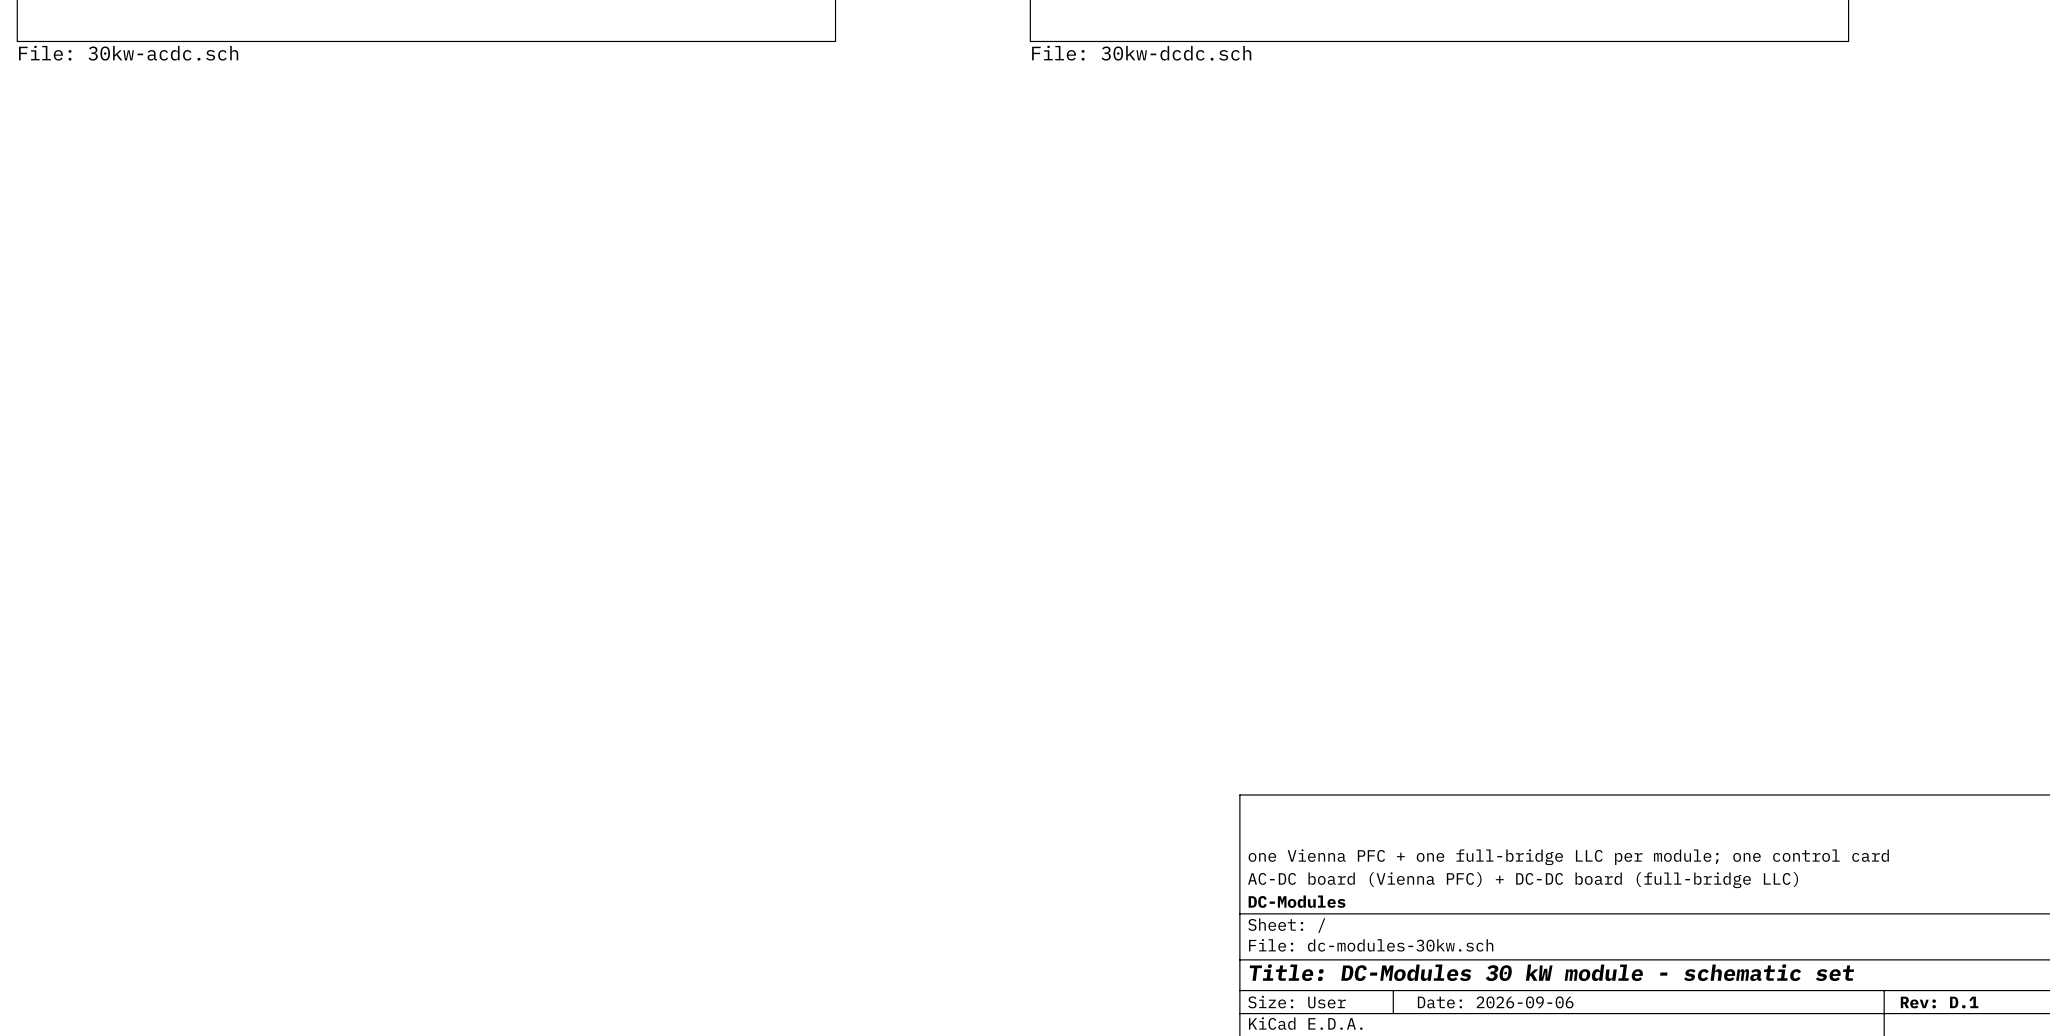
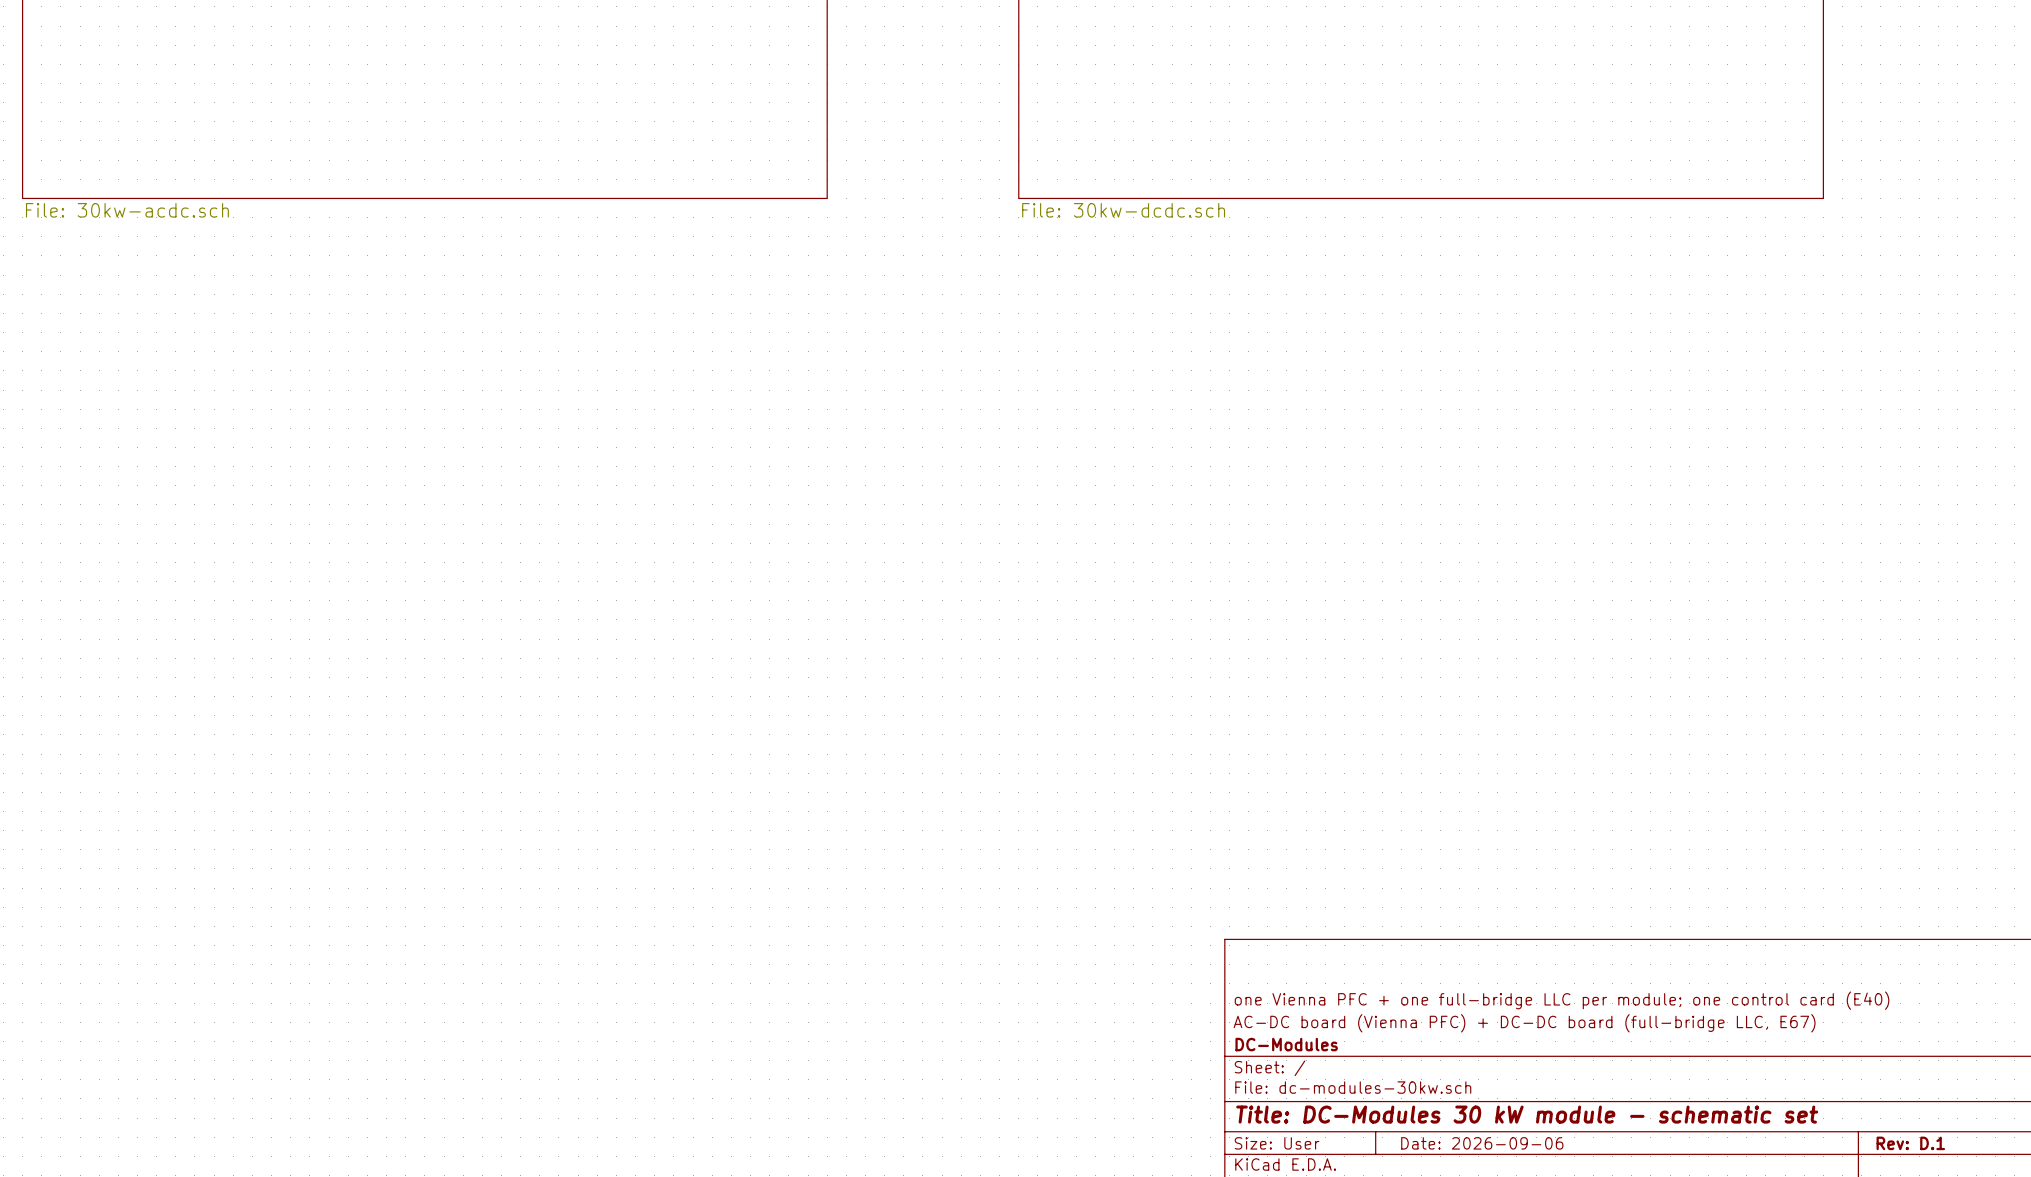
title block: one Vienna PFC + one full-bridge LLC per module; one control card (1568, 857) -> one Vienna PFC + one full-bridge LLC per module; one control card (E40) (1562, 1000)
title block: AC-DC board (Vienna PFC) + DC-DC board (full-bridge LLC) (1523, 880) -> AC-DC board (Vienna PFC) + DC-DC board (full-bridge LLC, E67) (1524, 1023)

